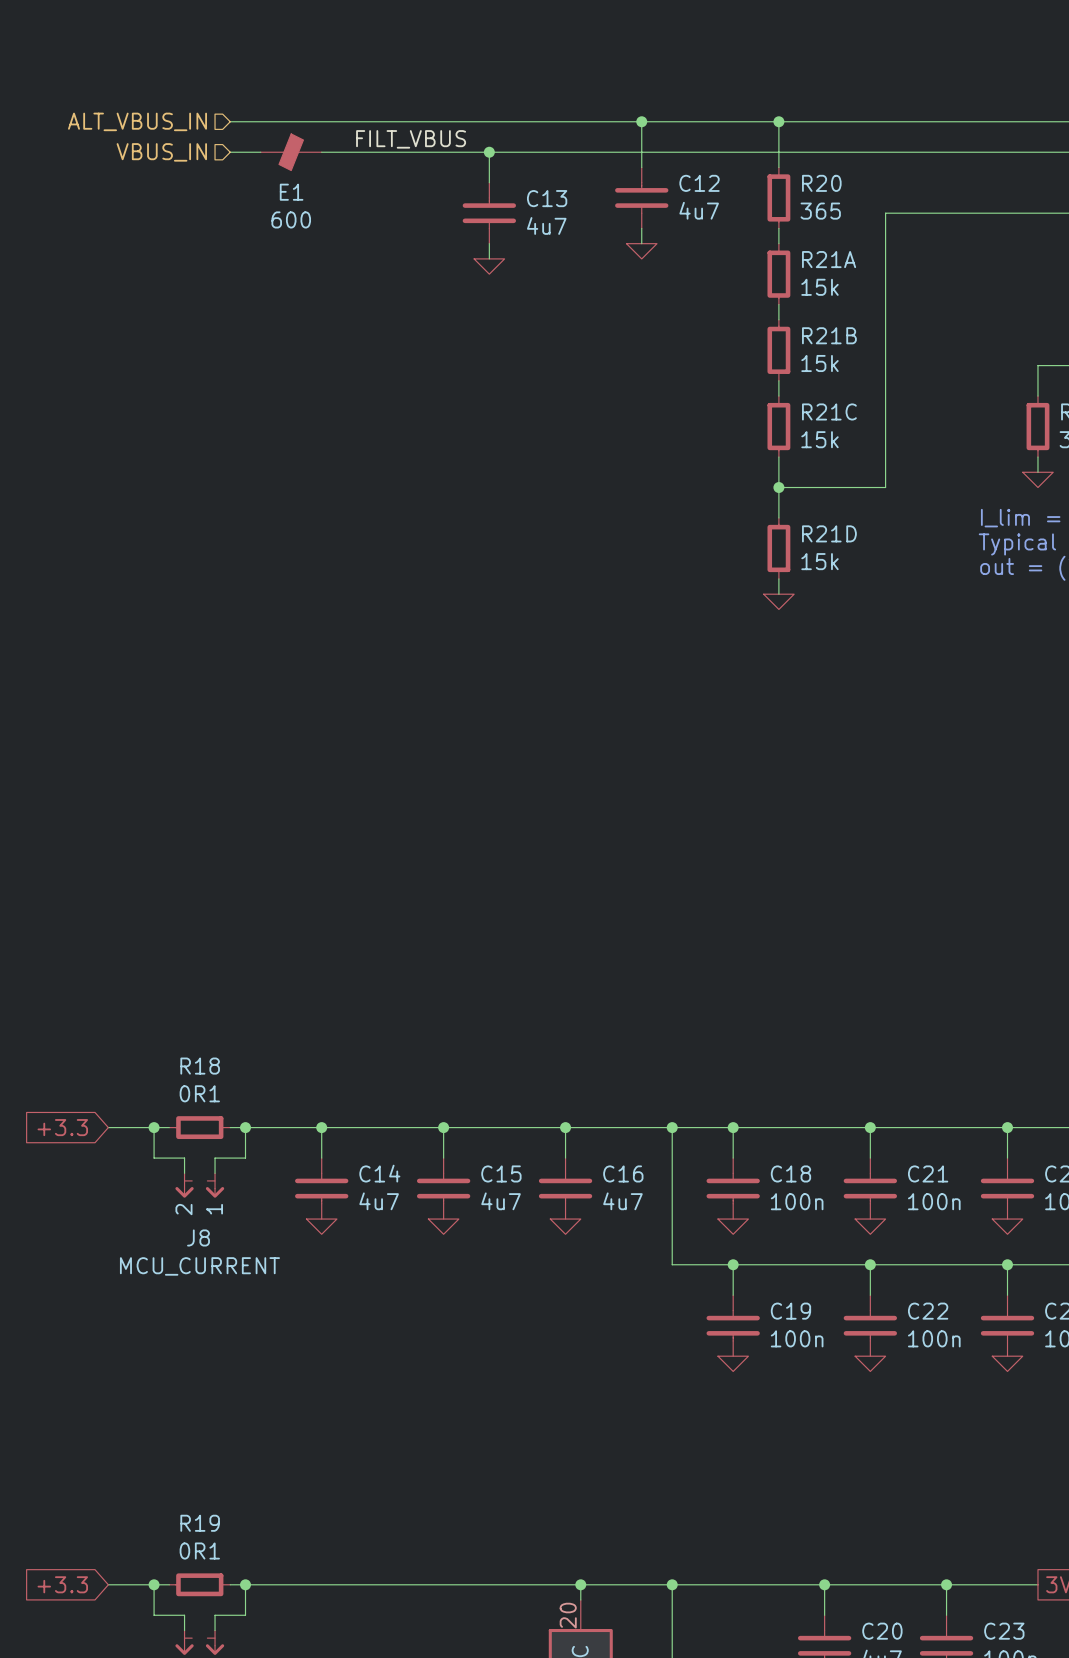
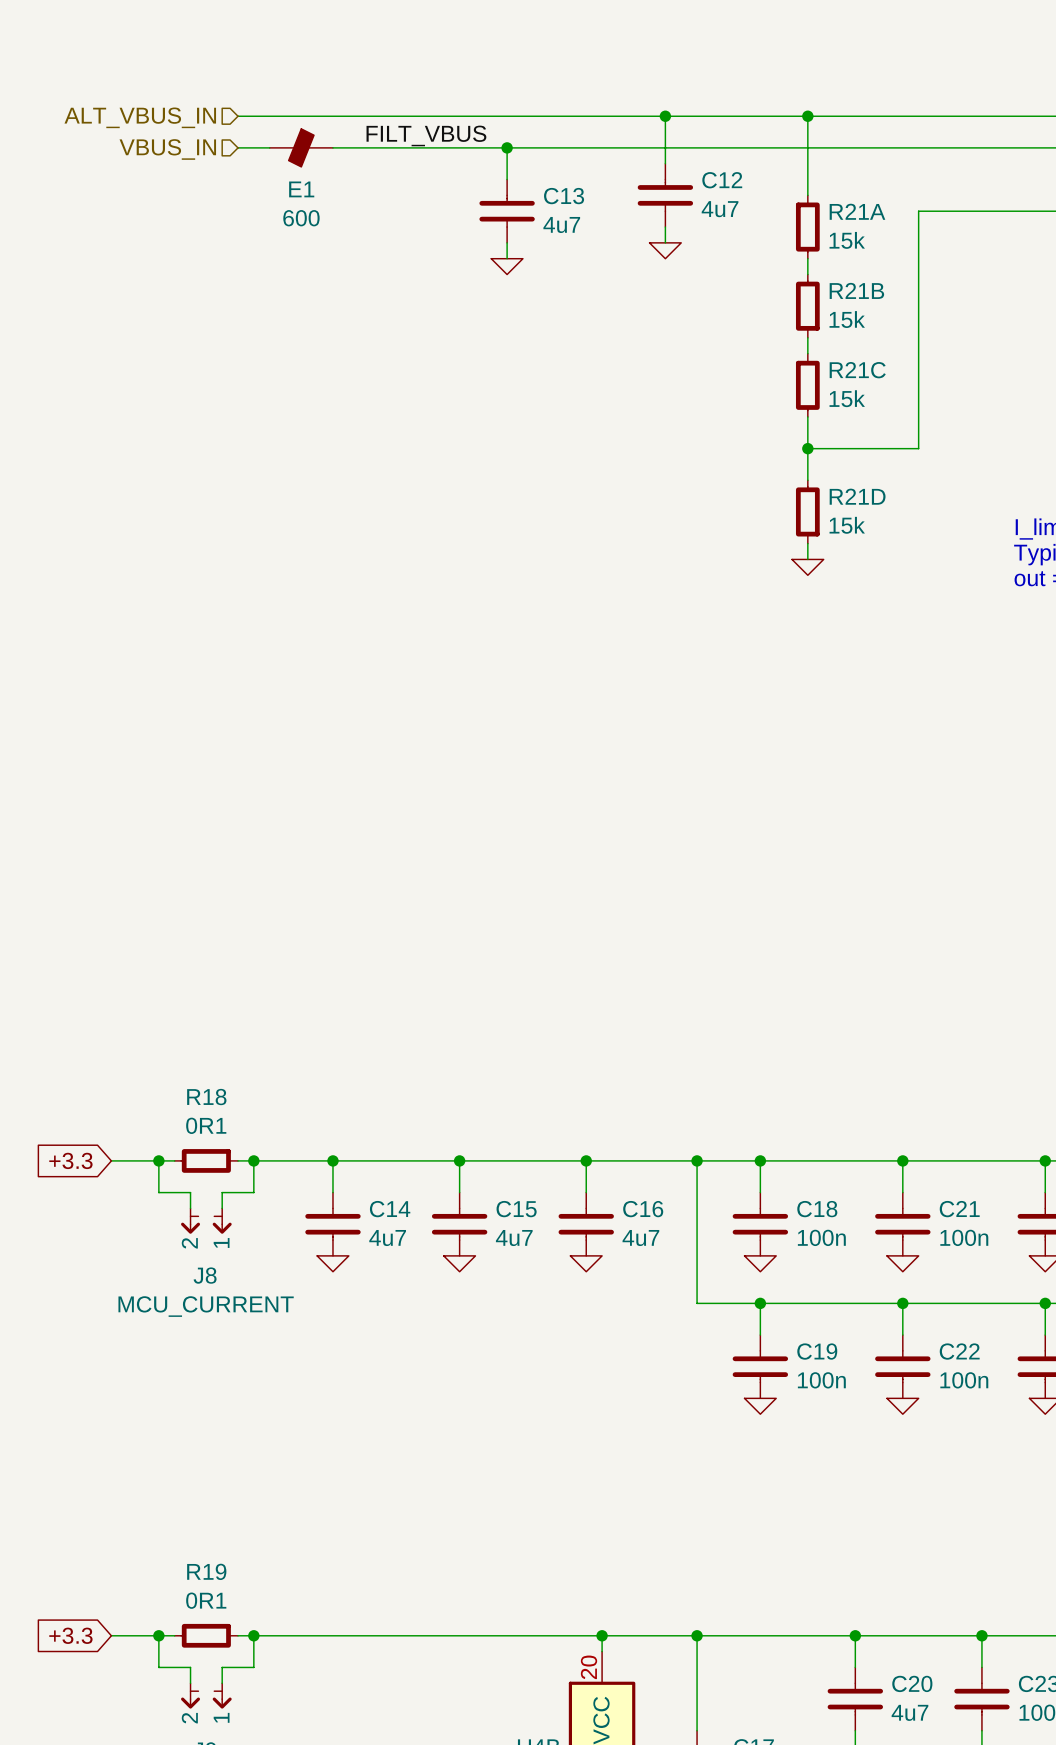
wire: none -> (807, 163) (807, 195)
R20: 365 (778, 197) -> none
wire: (778, 228) (778, 243) -> none
R21A position: (778, 274) -> (807, 227)
wire: (778, 304) (778, 319) -> (807, 258) (807, 274)
R21B position: (778, 350) -> (807, 306)
wire: (778, 380) (778, 396) -> (807, 337) (807, 353)
R21C position: (778, 426) -> (807, 385)
wire: (885, 441) (885, 487) (778, 487) -> (918, 448) (807, 448)
wire: (778, 472) (778, 517) -> (807, 416) (807, 464)
junction position: (778, 487) -> (807, 448)
R21D position: (778, 548) -> (807, 511)
wire: (778, 578) (778, 594) -> (807, 543) (807, 559)
power symbol position: (778, 601) -> (807, 567)

